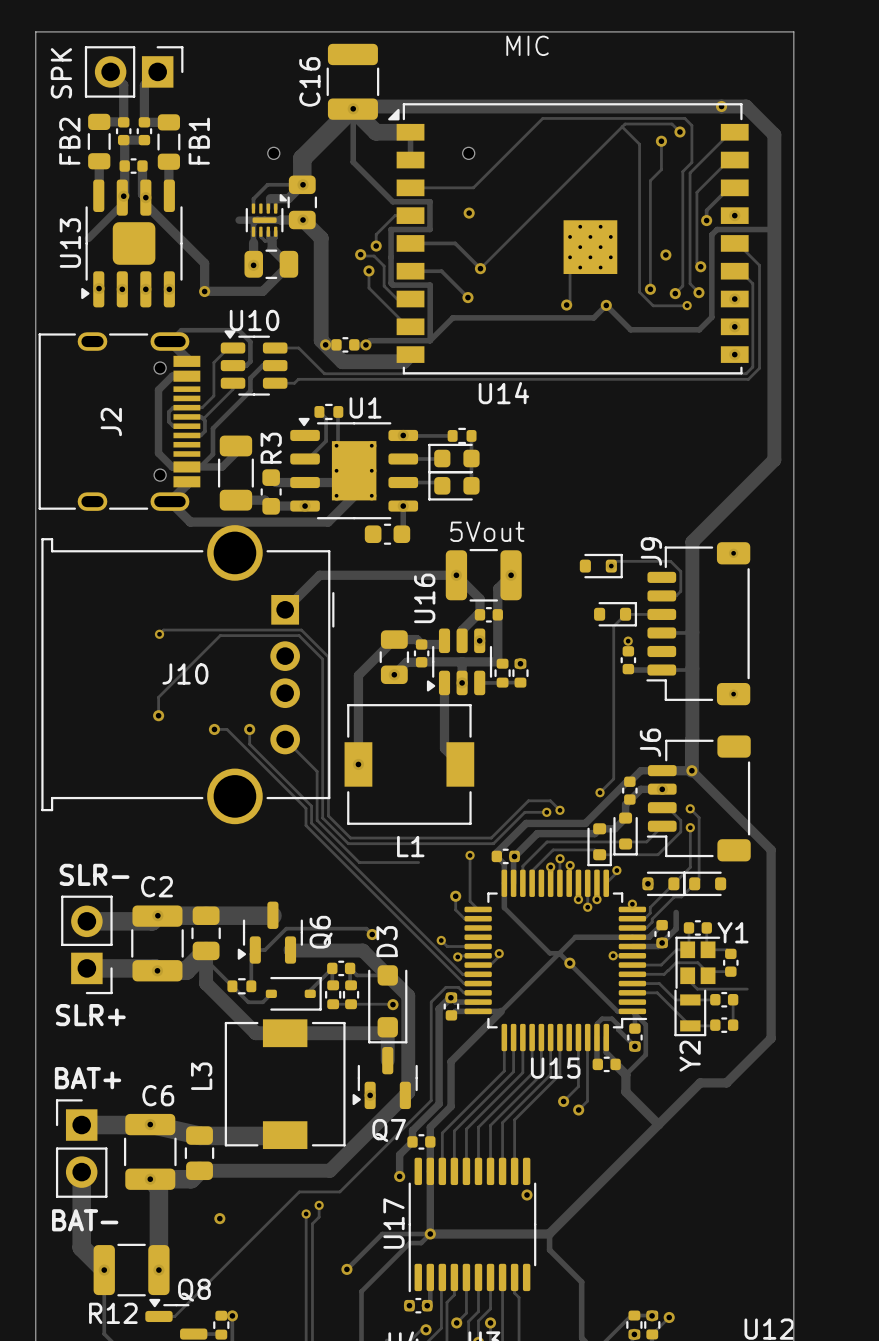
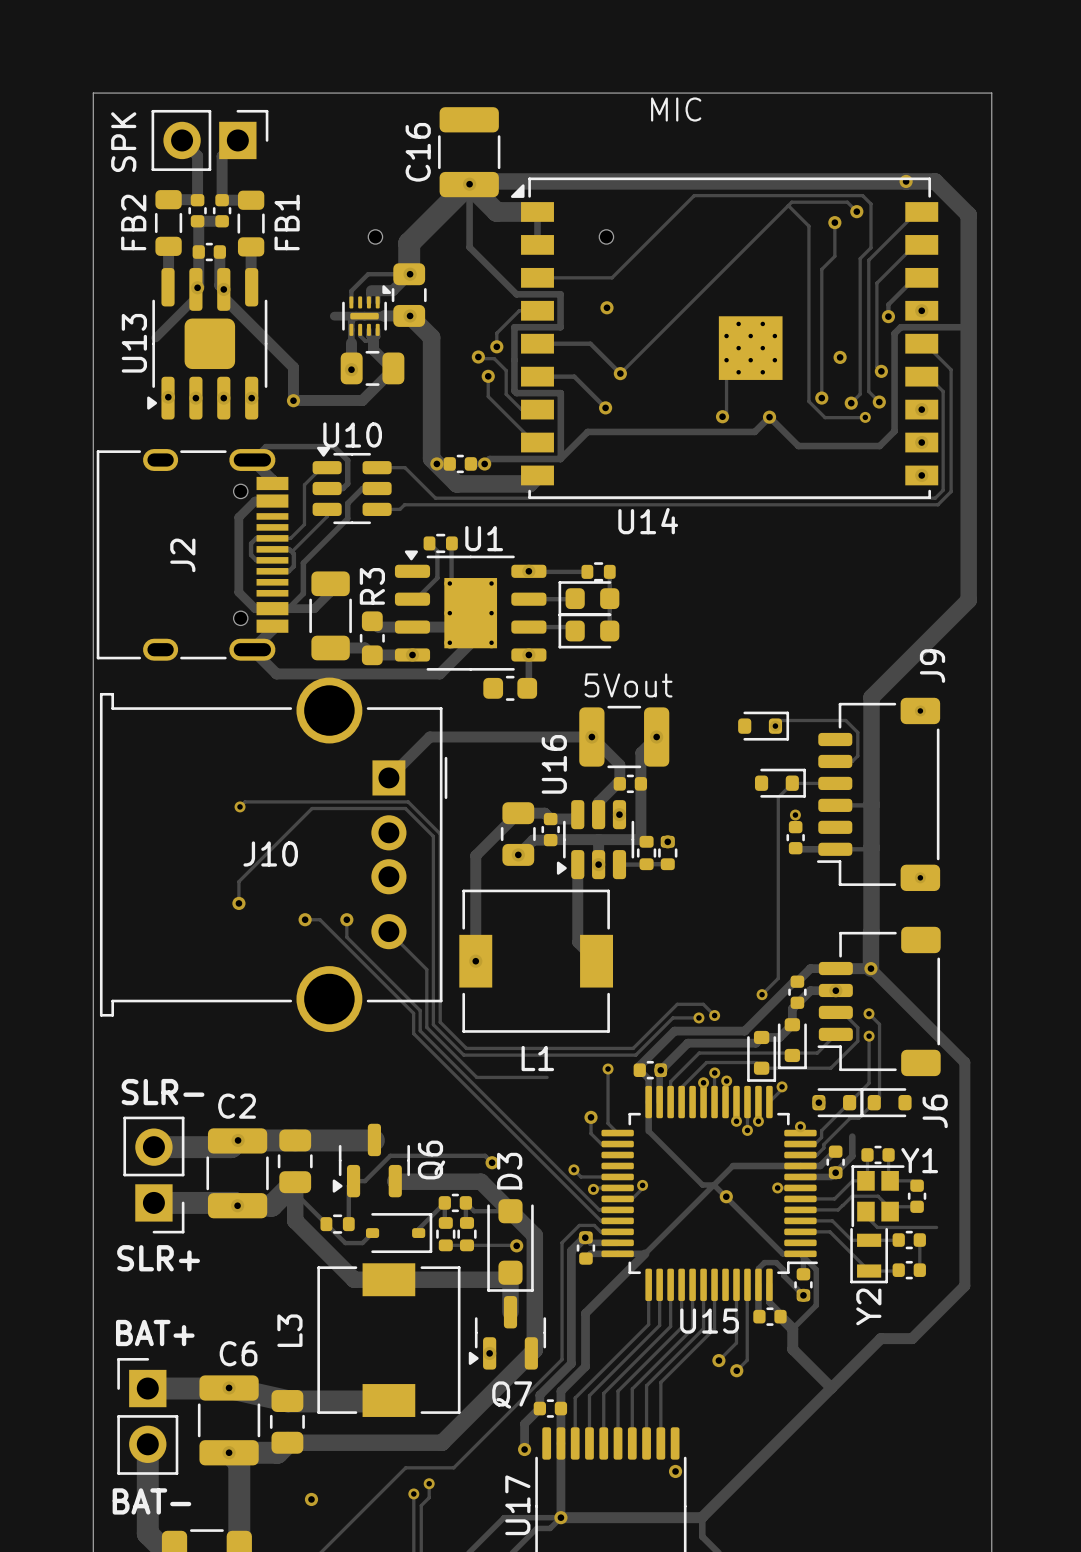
J9 name position: J9 (651, 551) -> J9 (932, 666)
J6 name position: J6 (650, 742) -> J6 (935, 1111)

